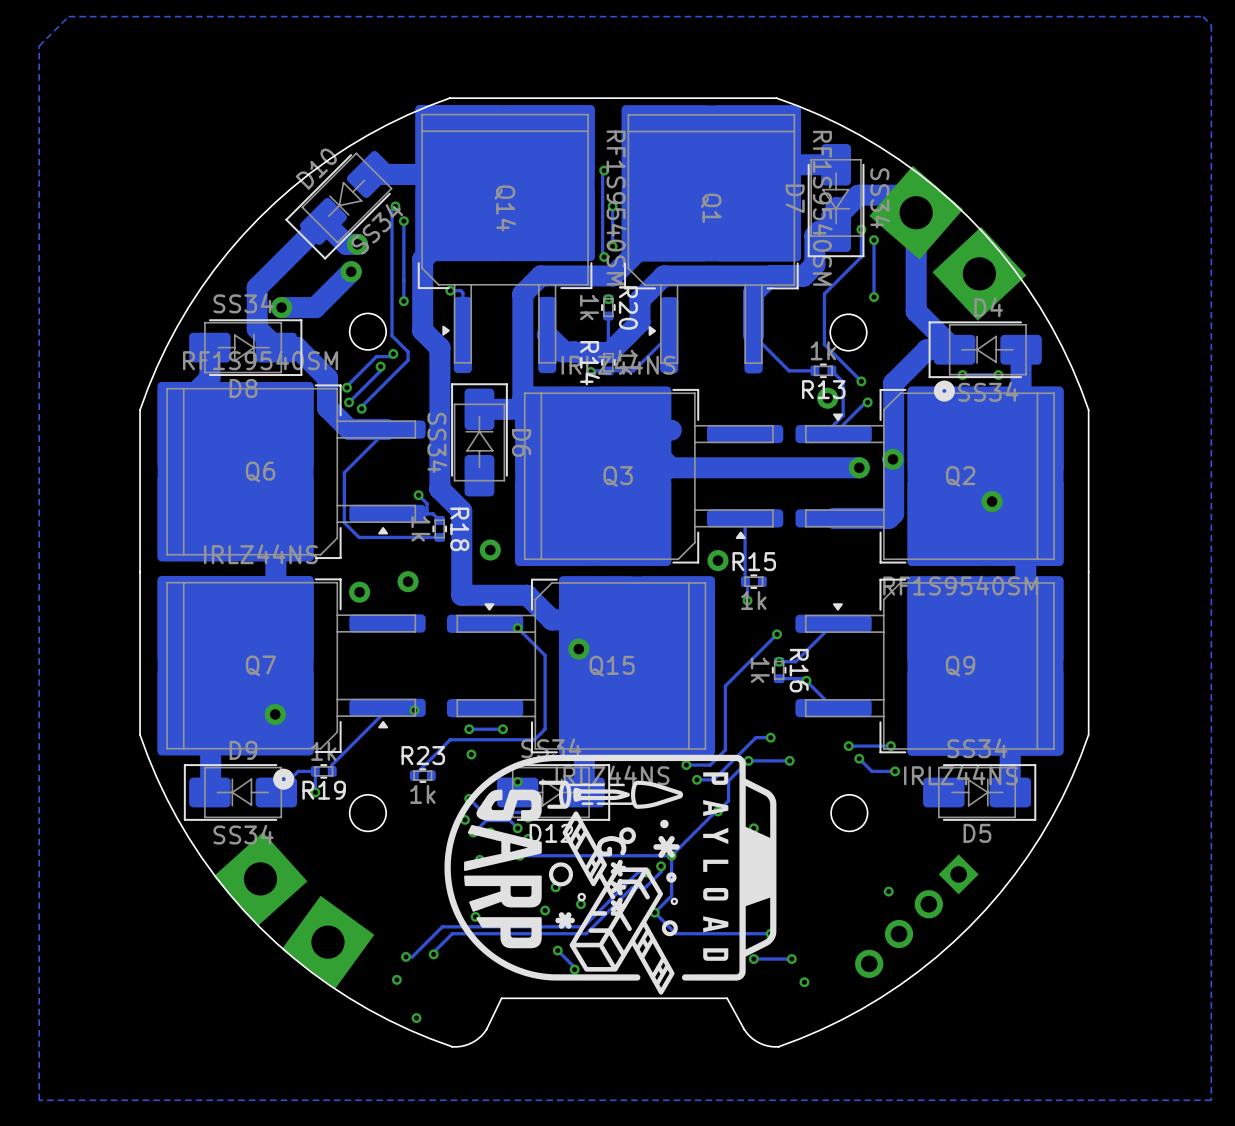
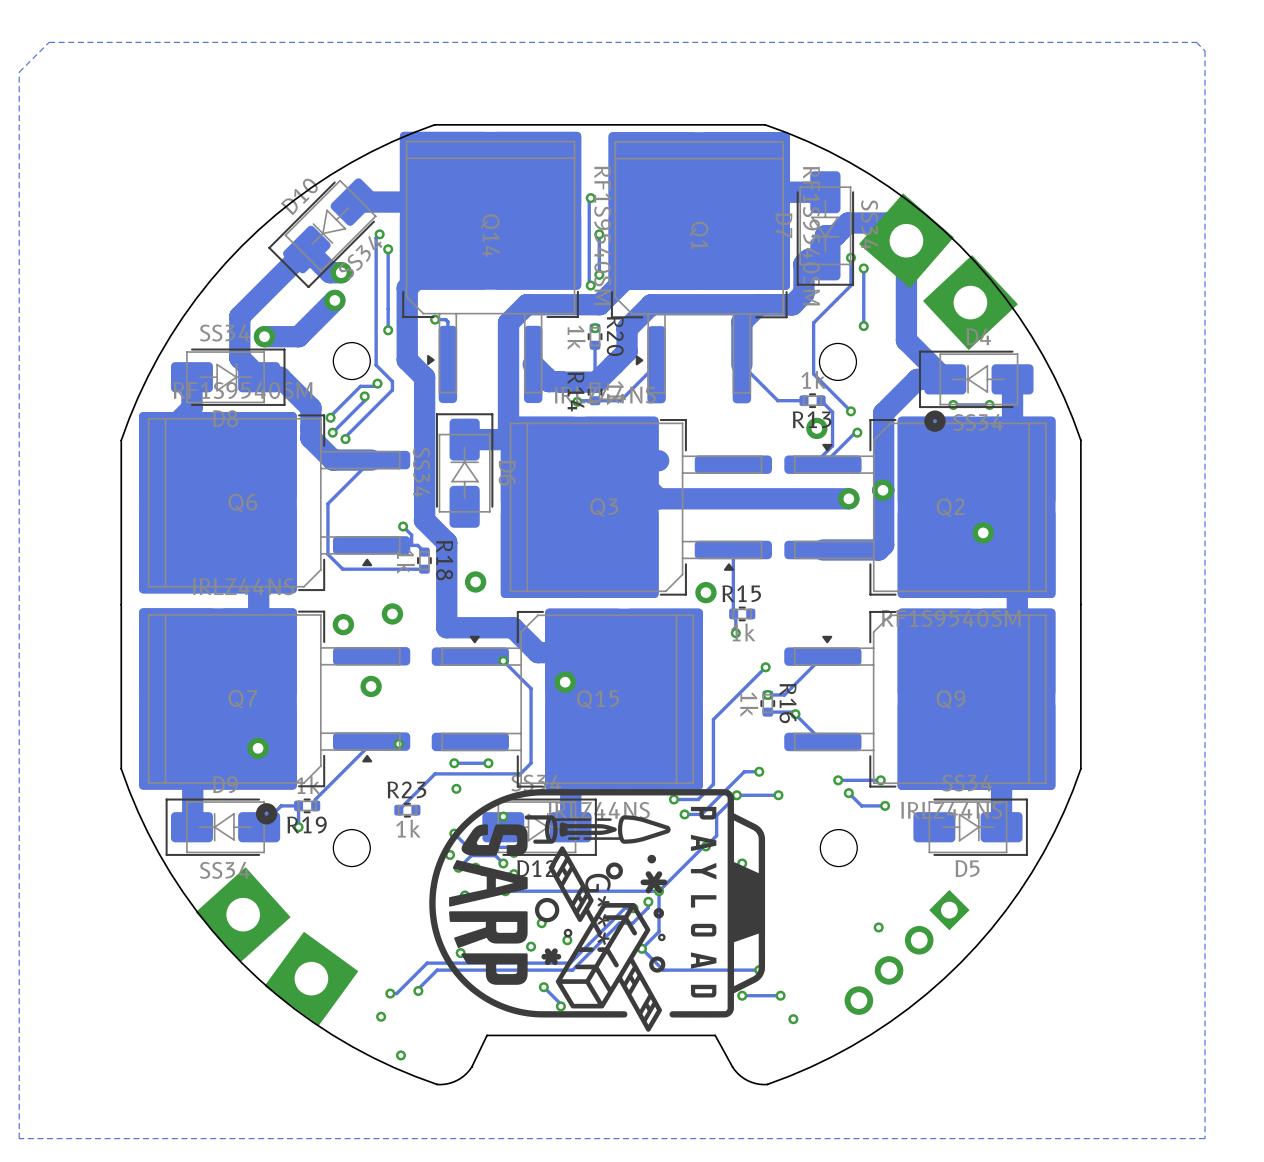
via: none -> (371, 686)

